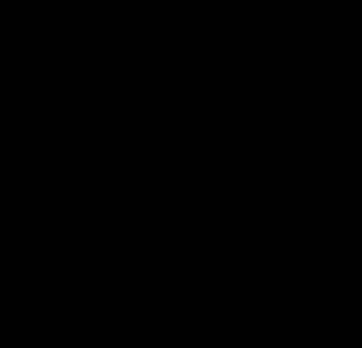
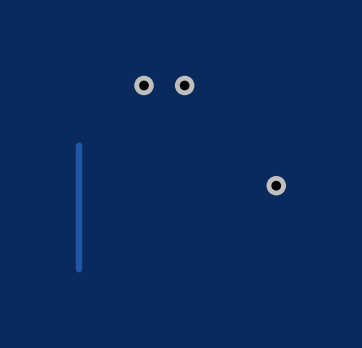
via: none -> (144, 85)
via: none -> (184, 85)
track: none -> (78, 145) (78, 269)
via: none -> (276, 185)

